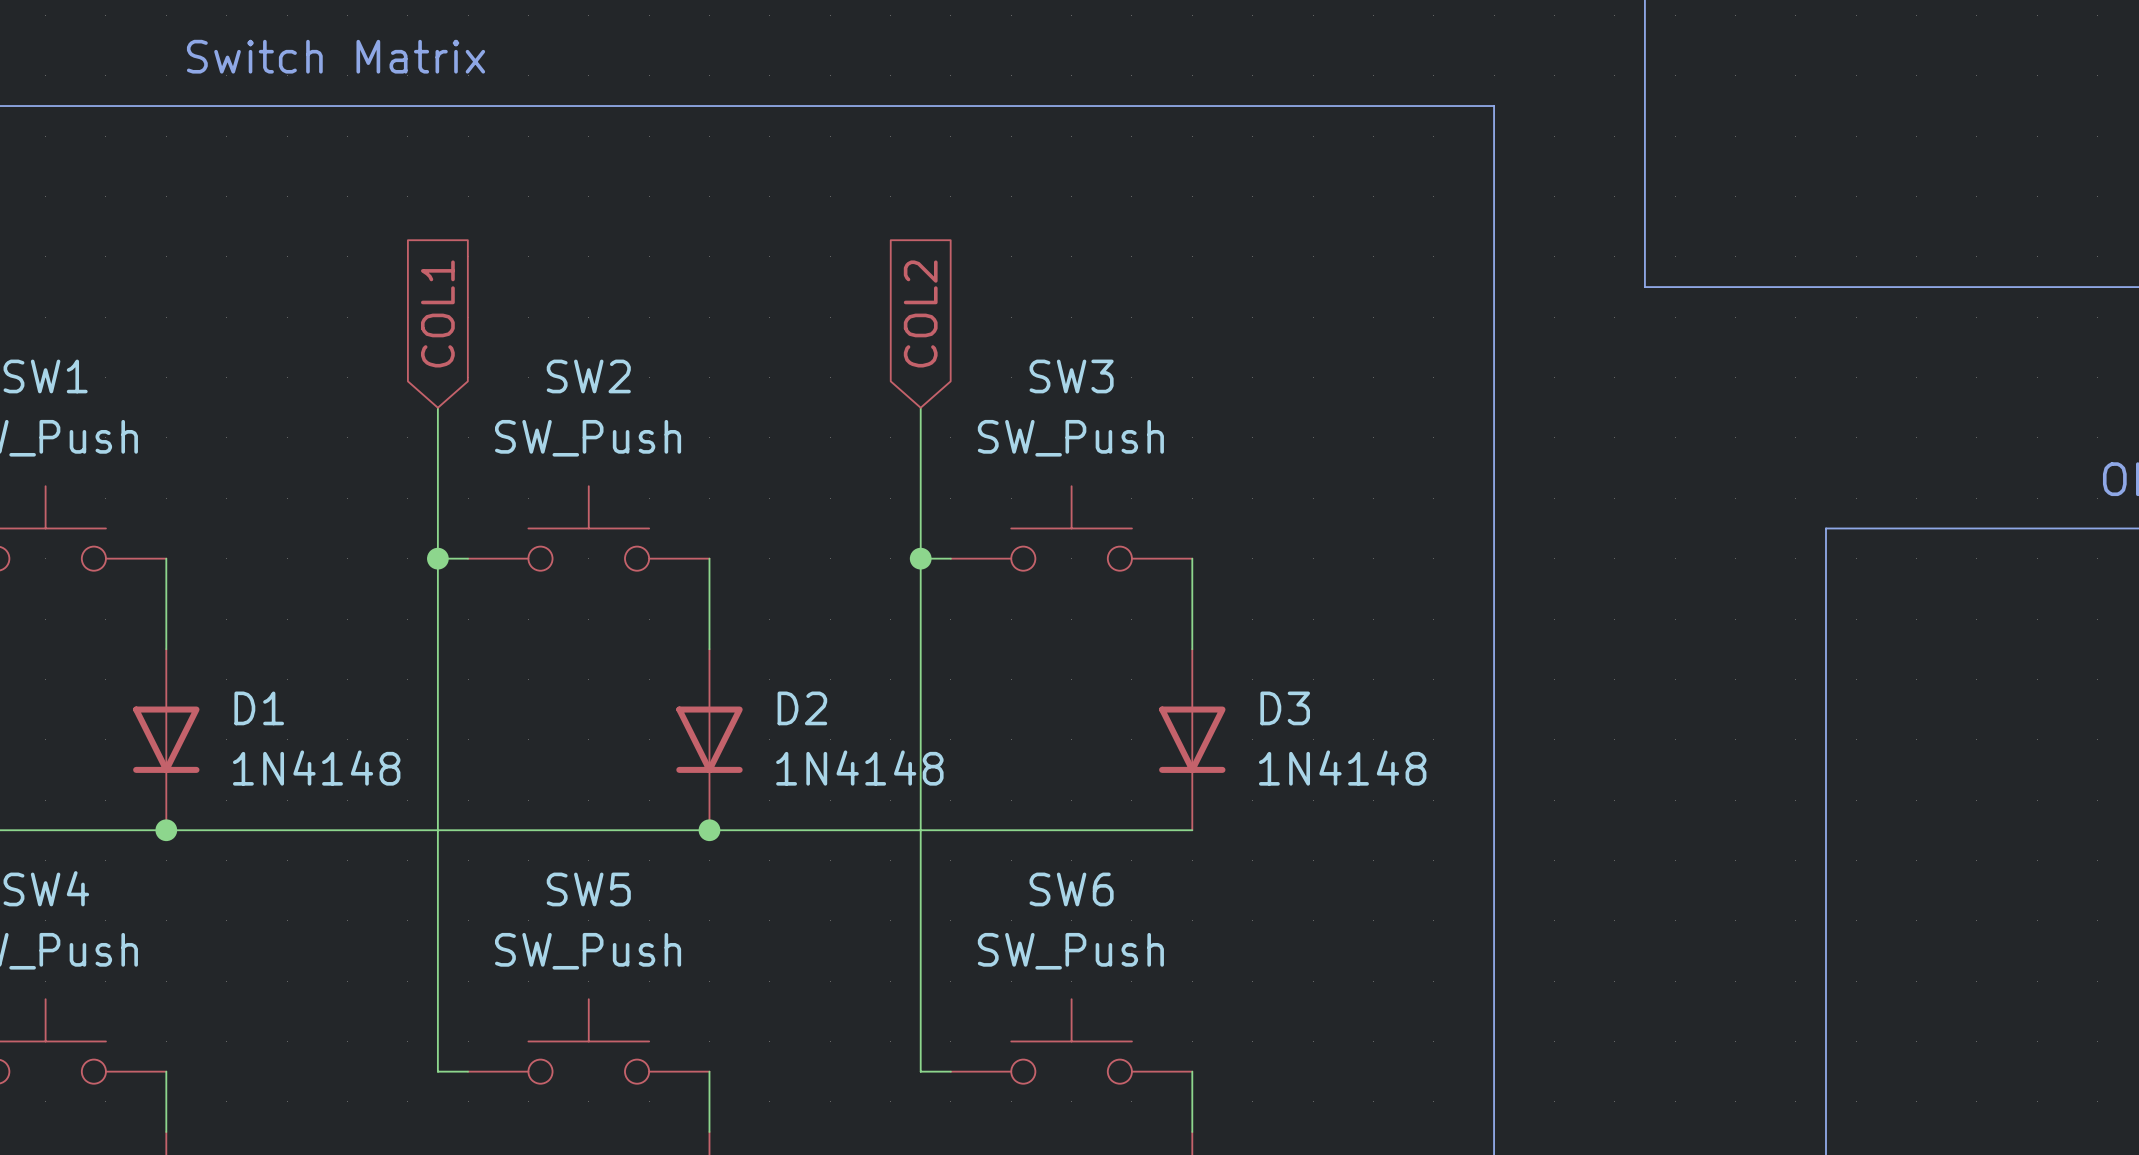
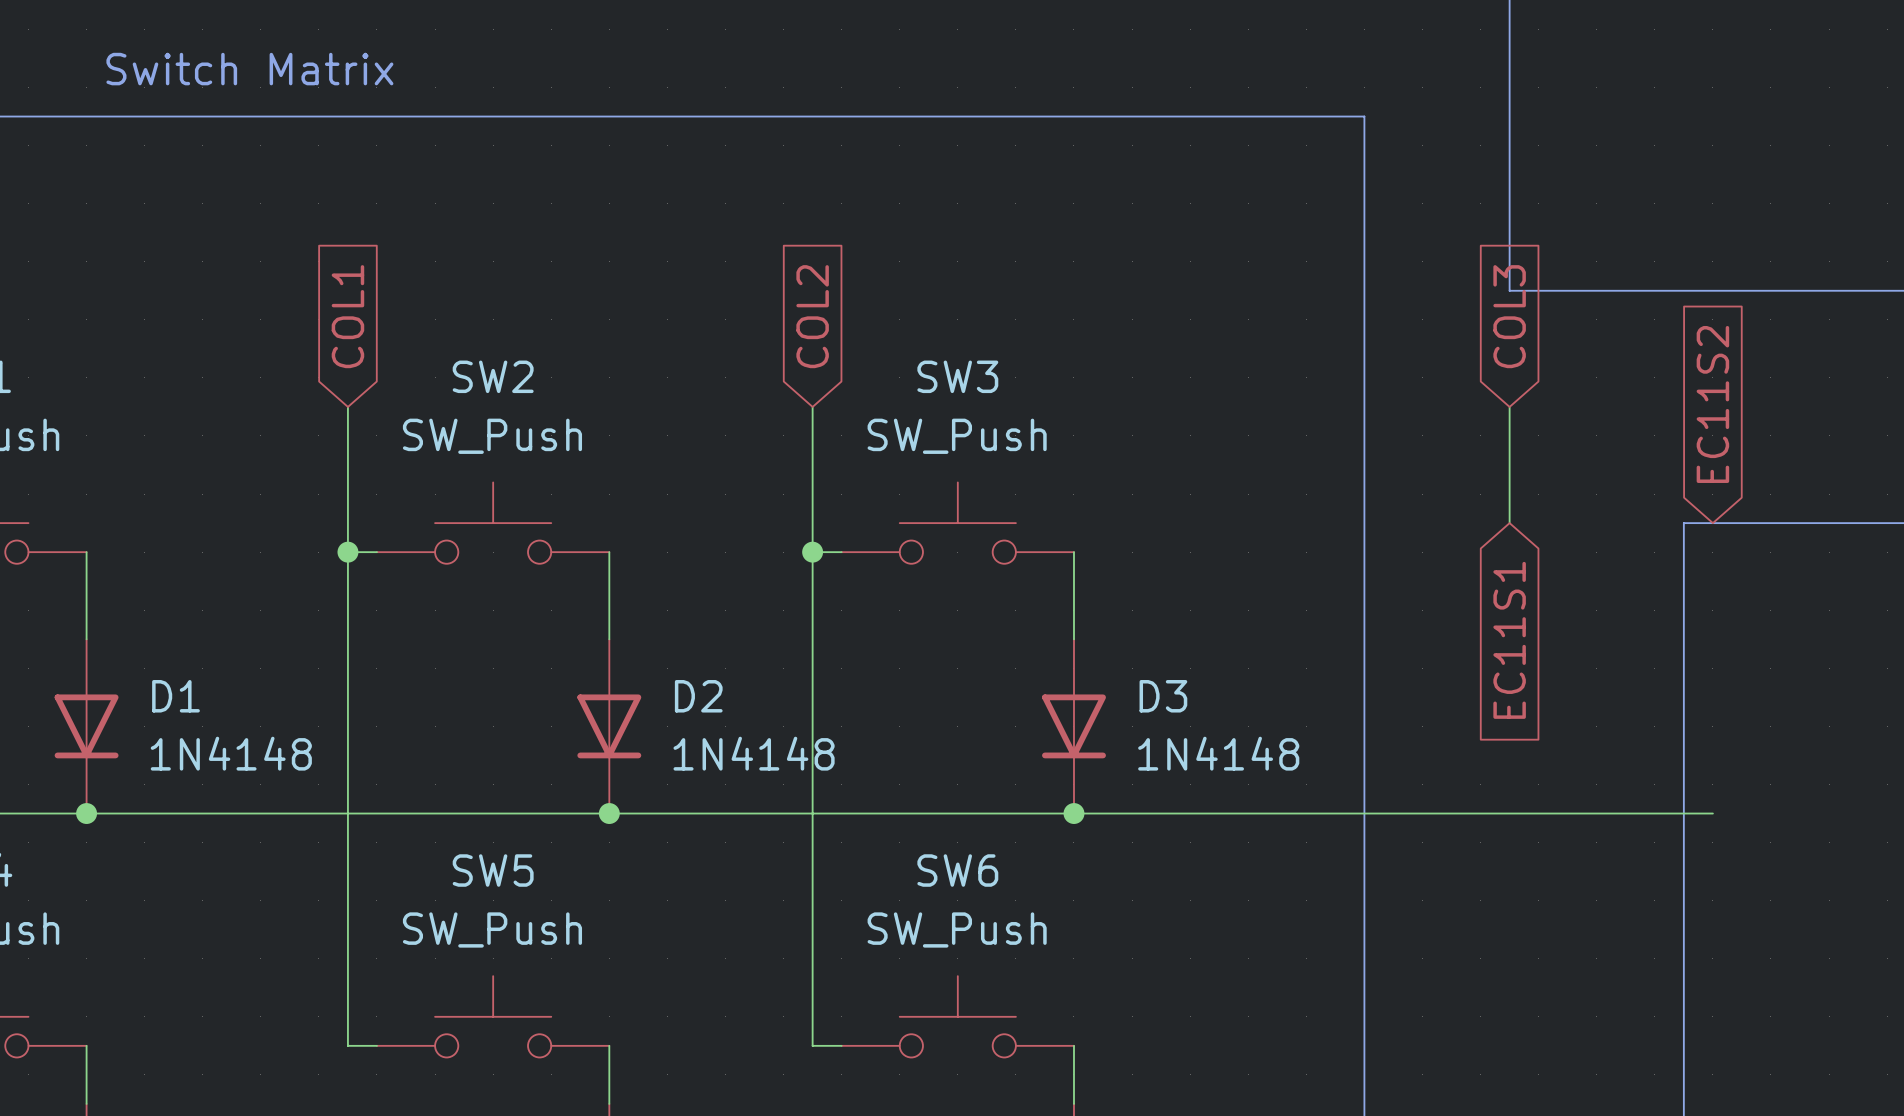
global label: none -> COL3 (1509, 316)
global label: none -> EC11S2 (1712, 404)
wire: none -> (1509, 406) (1509, 523)
global label: none -> EC11S1 (1509, 640)
wire: none -> (1073, 813) (1712, 813)
junction: none -> (1073, 813)

